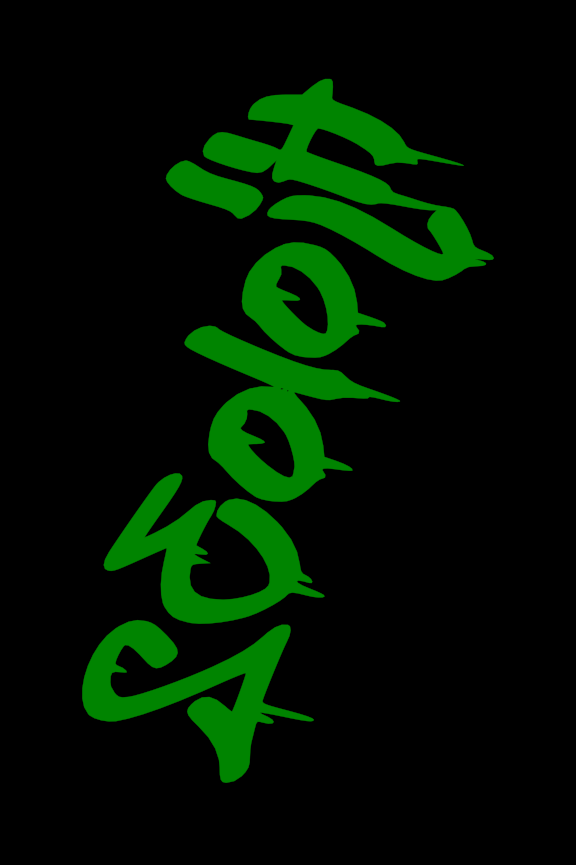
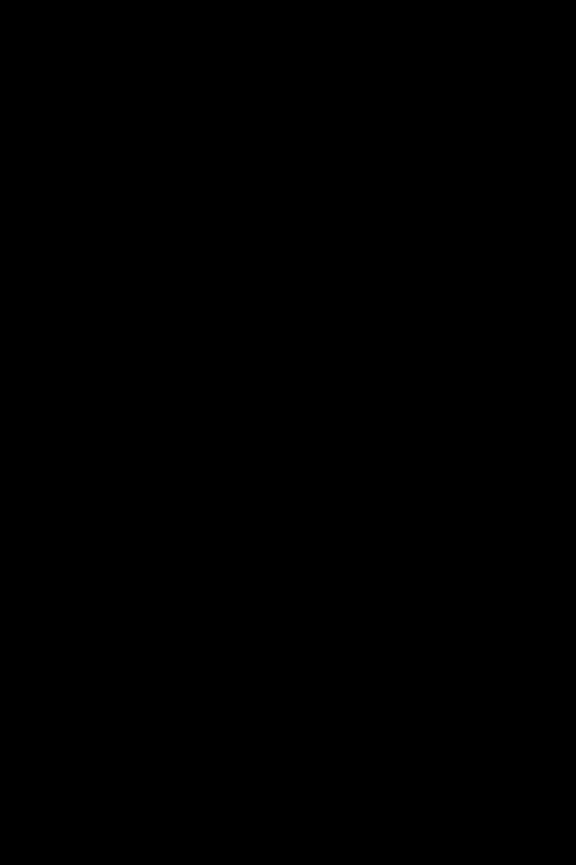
drawing: [82, 78, 494, 783] -> none

